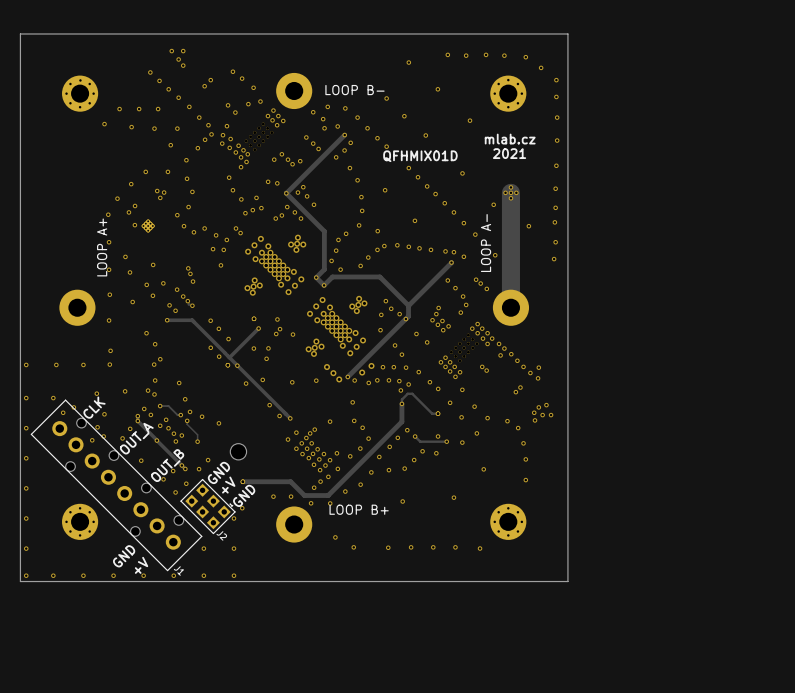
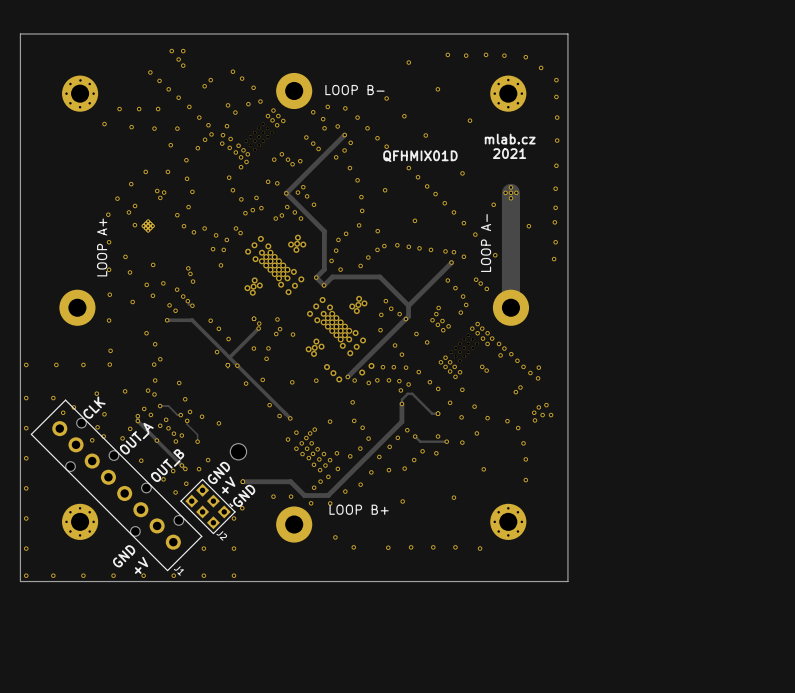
via: none -> (259, 323)
via: (210, 347) -> none
via: none -> (217, 352)
via: (219, 356) -> none

